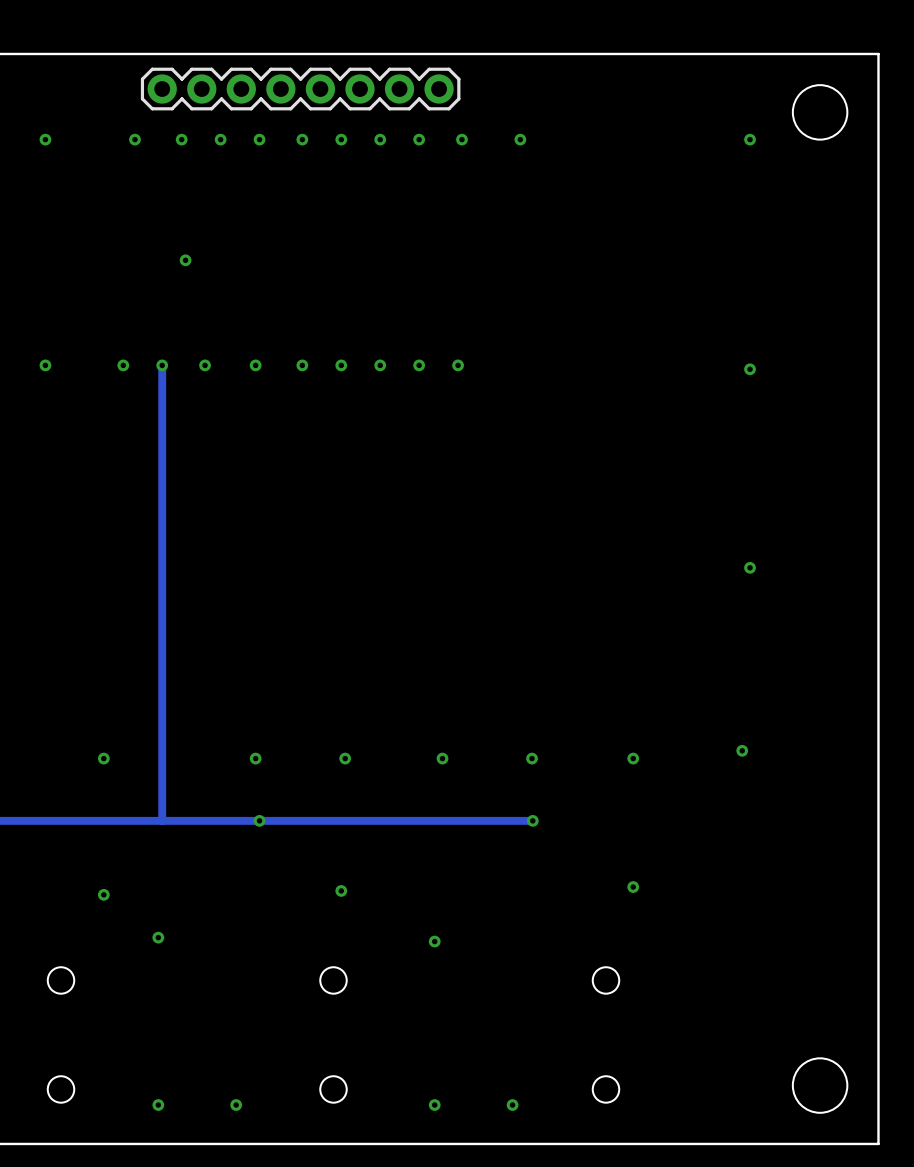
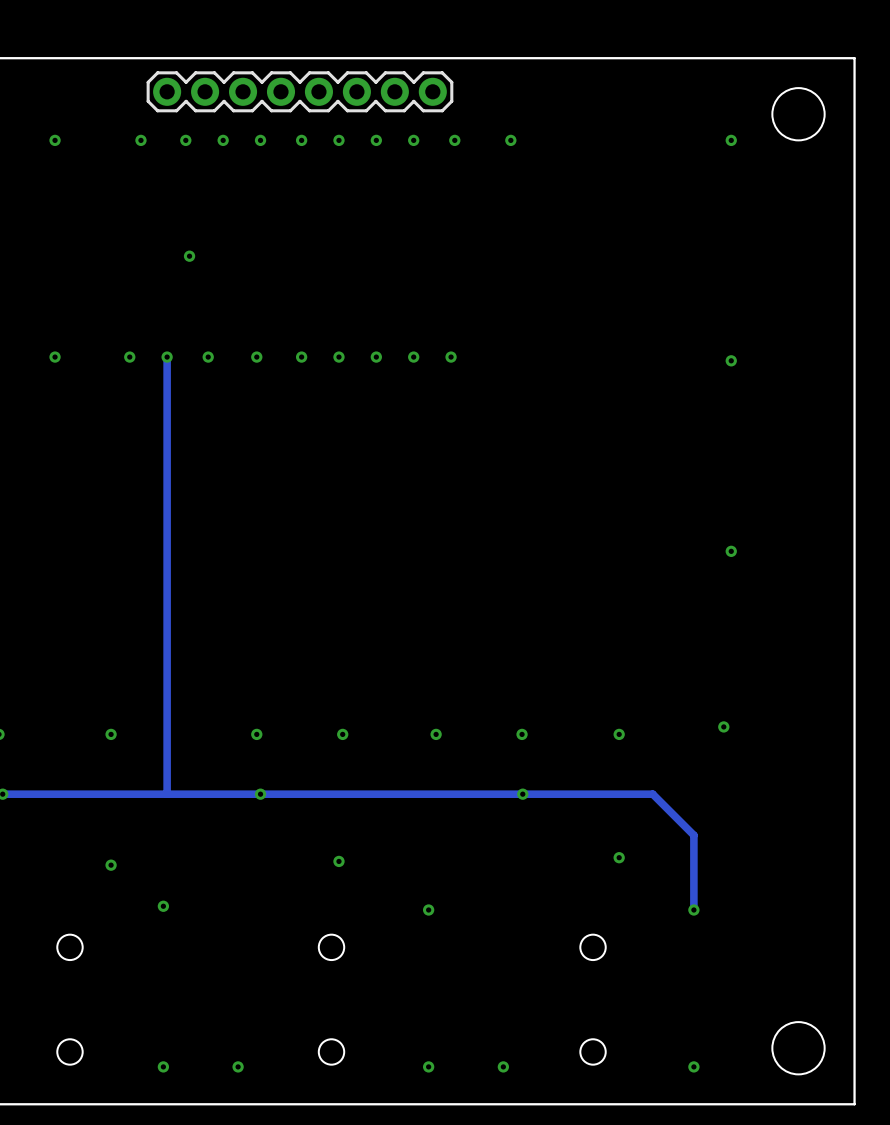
track: none -> (522, 794) (652, 794) (693, 835) (693, 910)
via: none -> (693, 910)
via: none -> (693, 1066)

